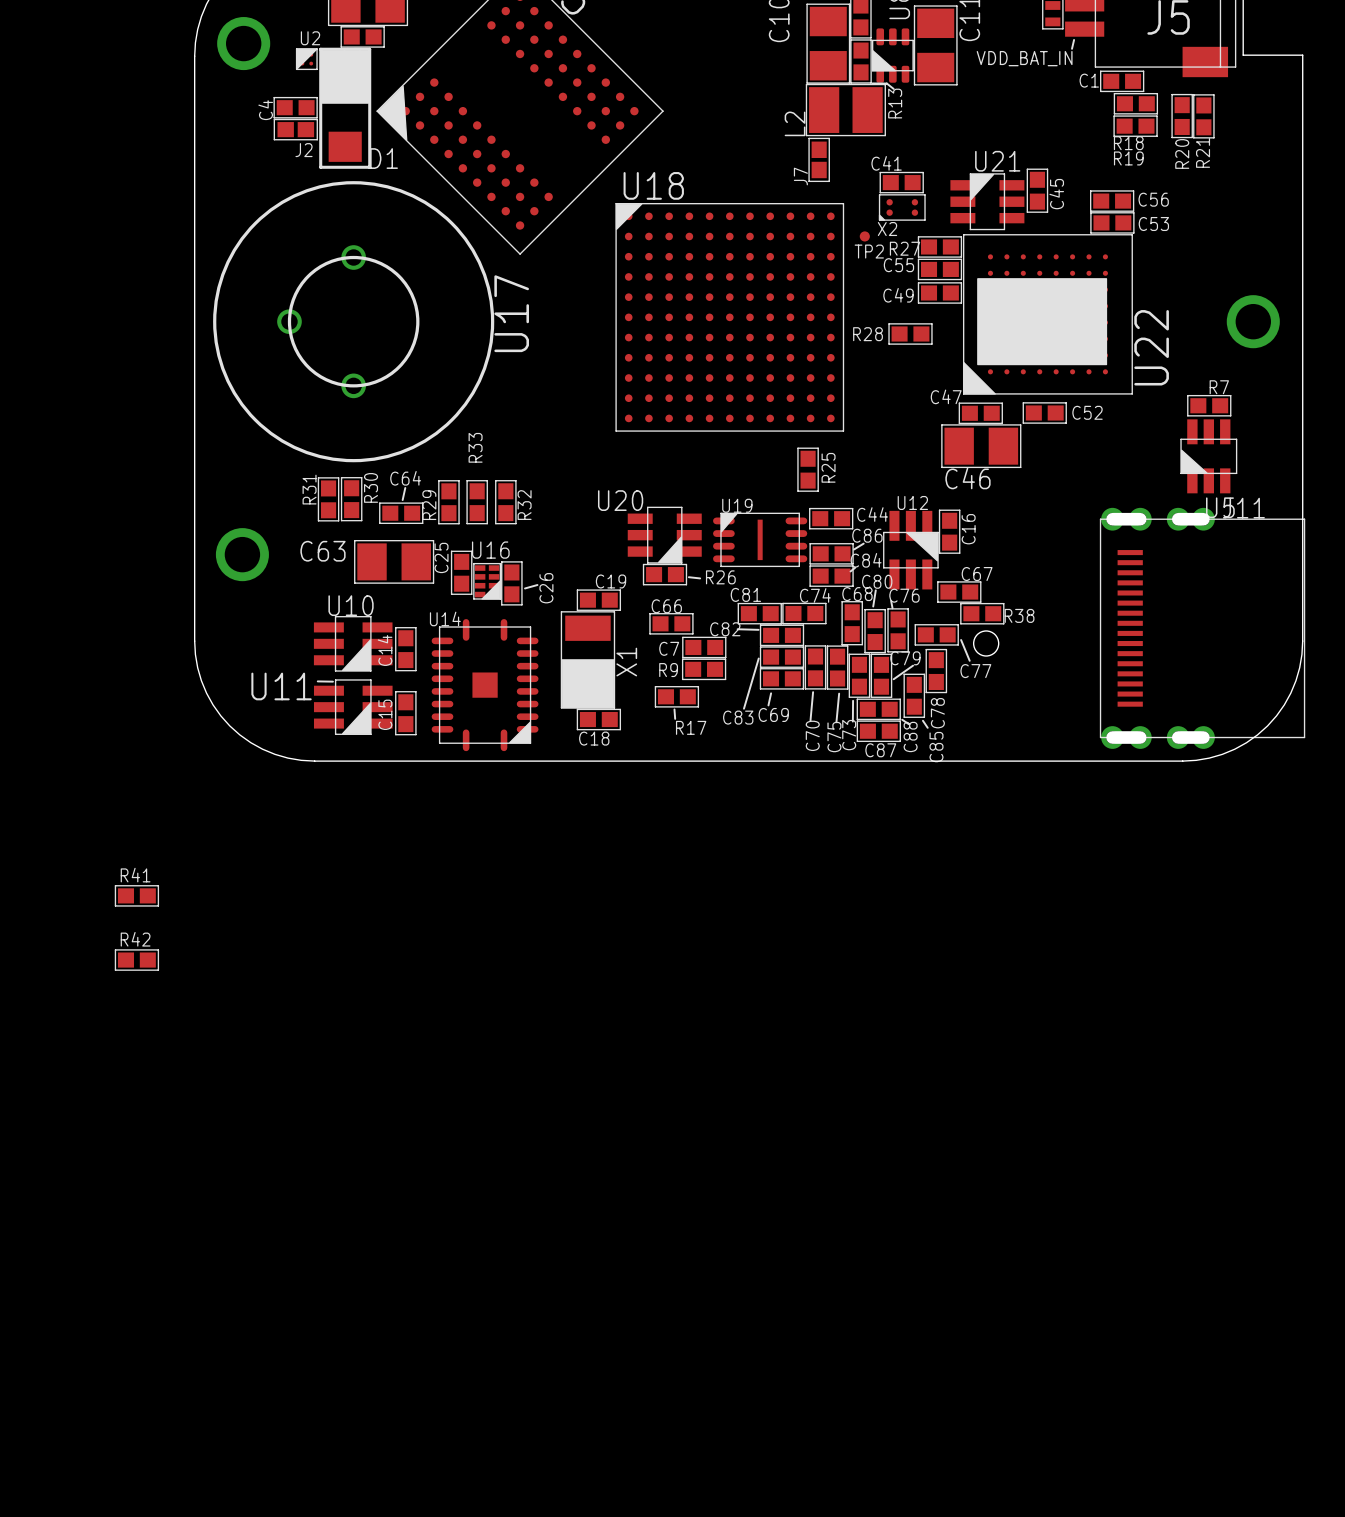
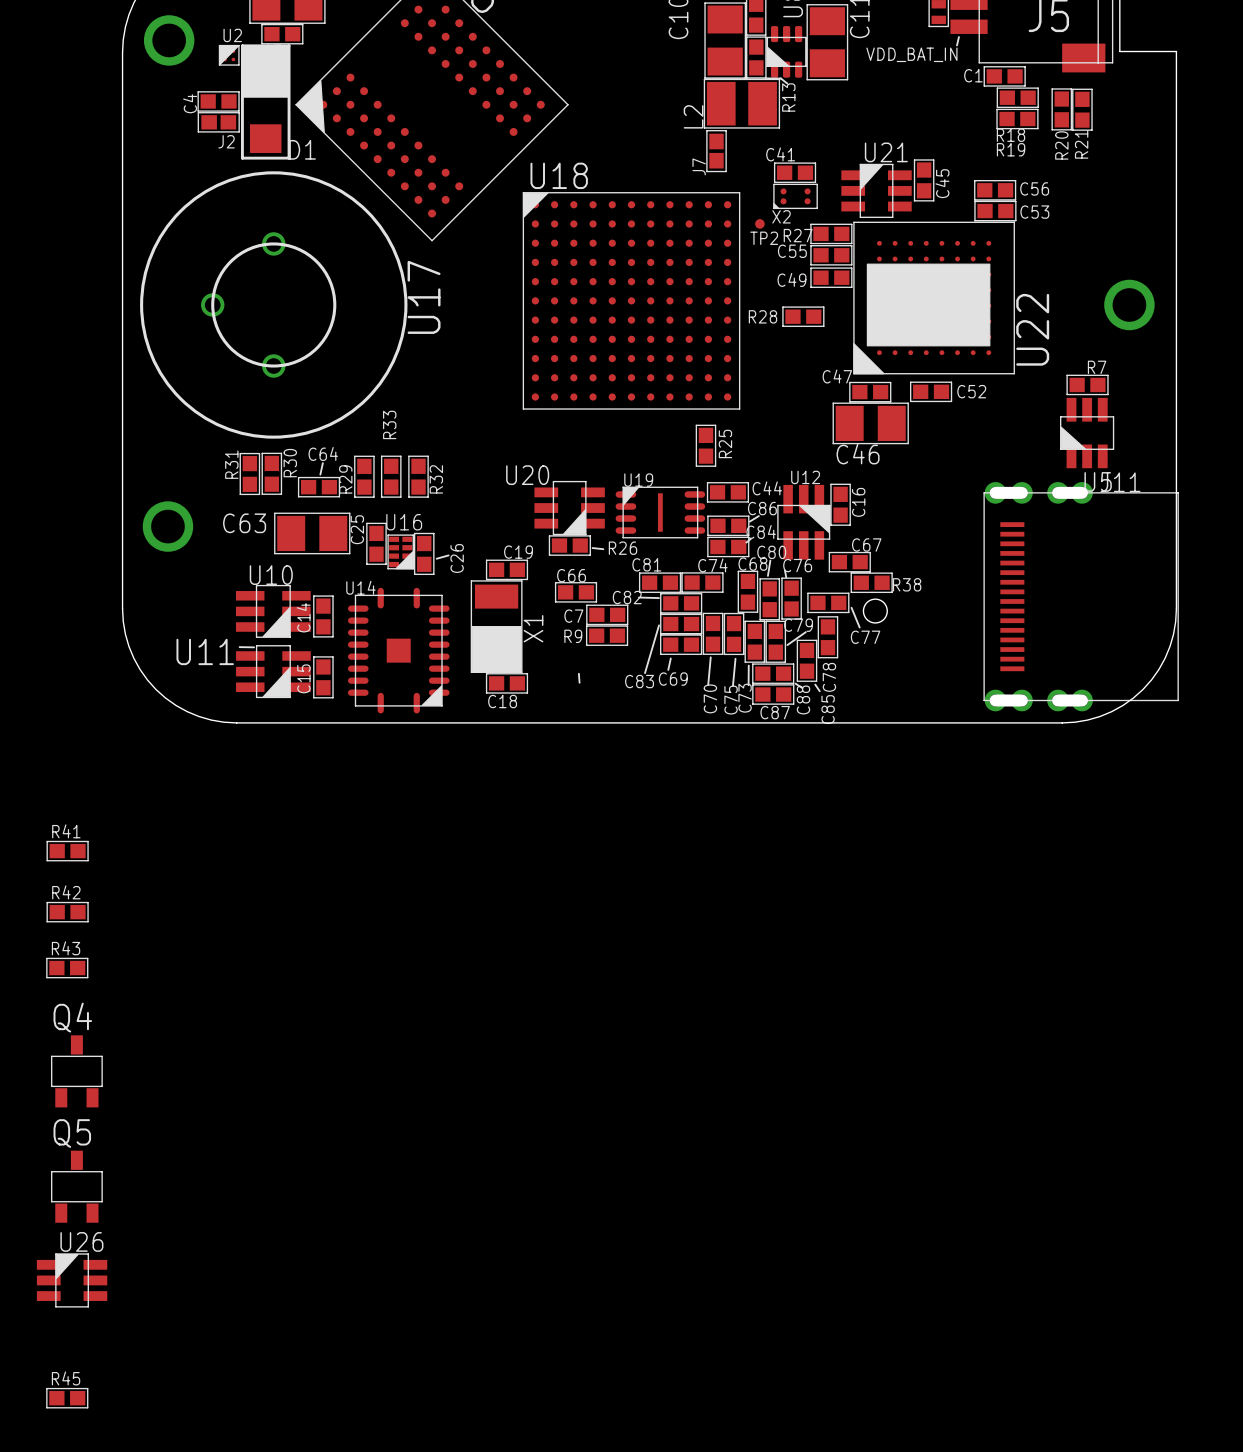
R17: (676, 696) -> none
R43: none -> (67, 968)
Q4: none -> (76, 1071)
Q5: none -> (76, 1186)
U26: none -> (72, 1280)
R45: none -> (67, 1398)

